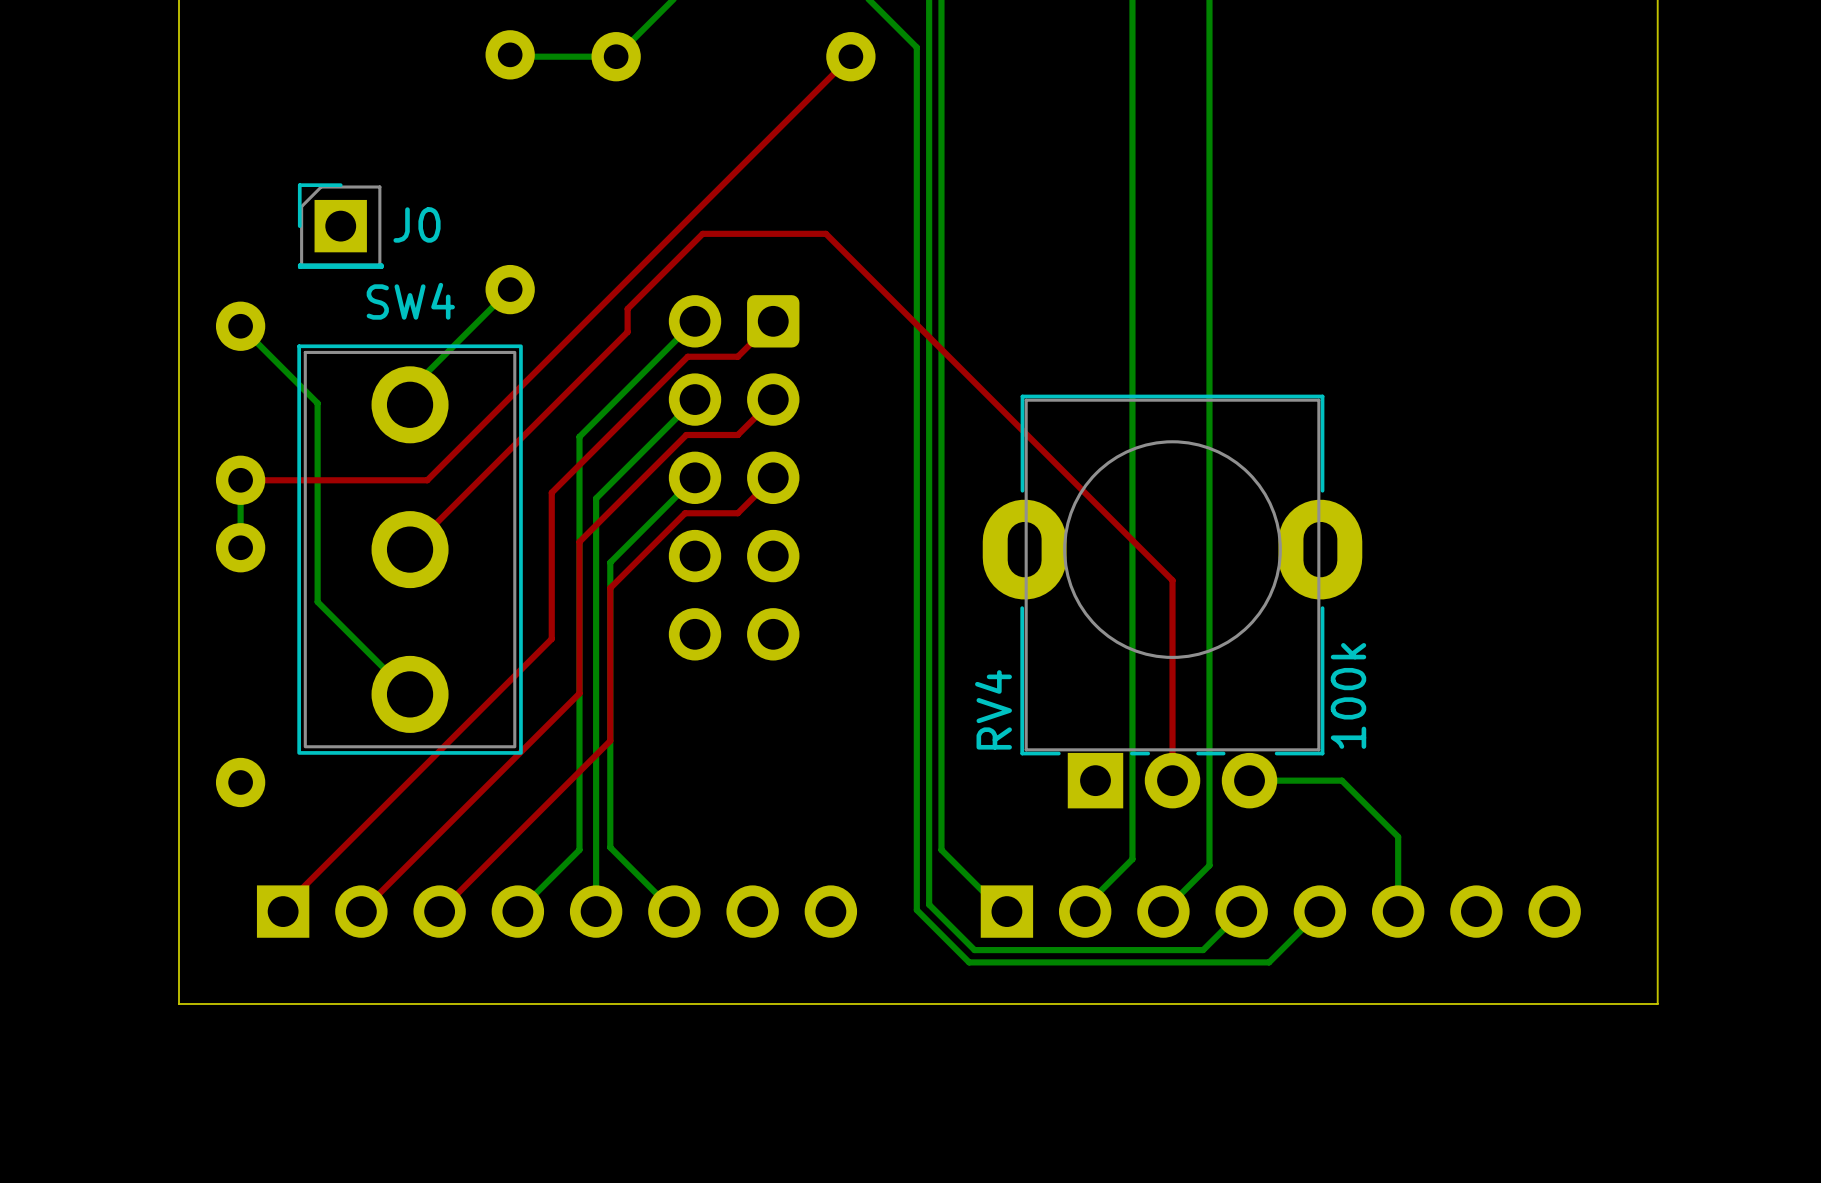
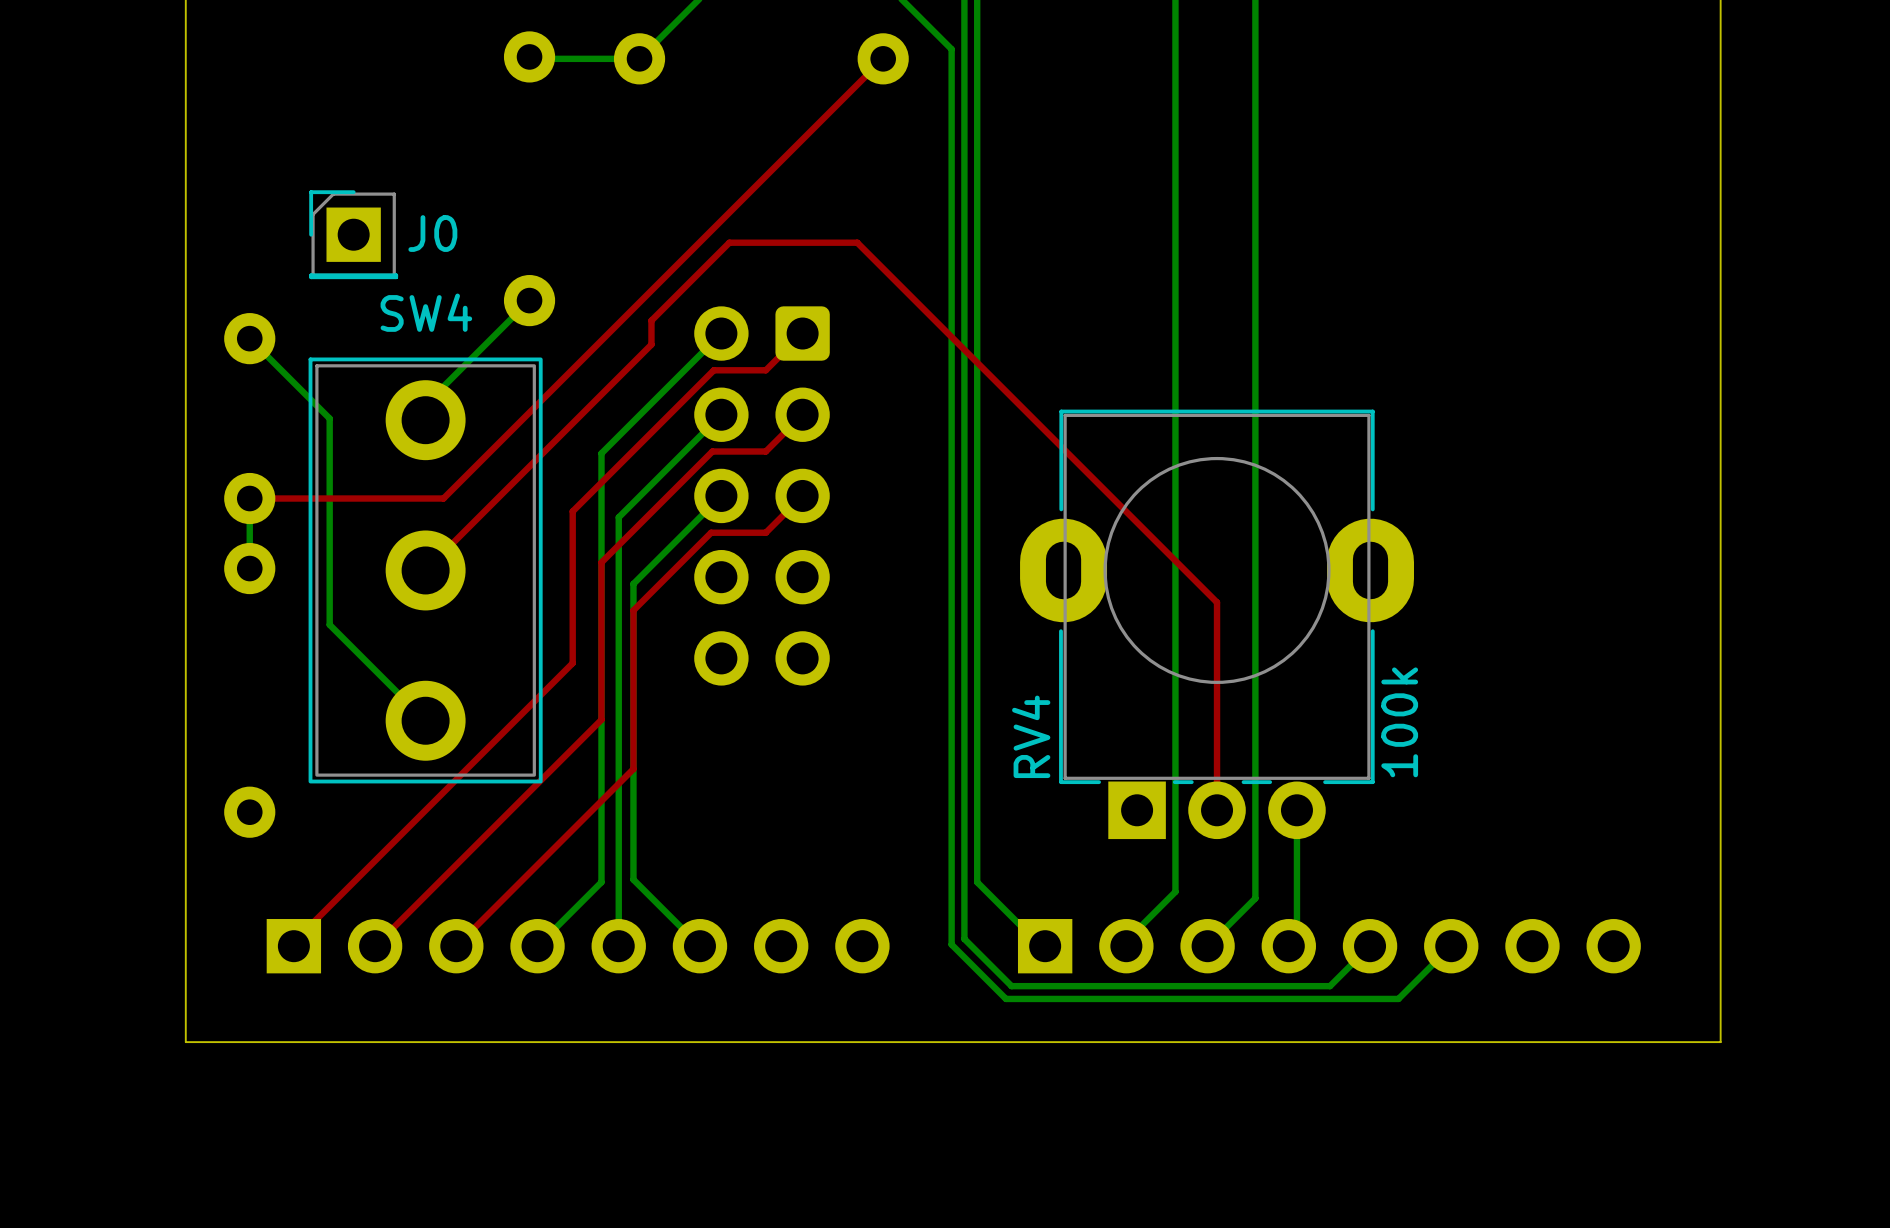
bottom track: (1249, 780) (1341, 780) (1398, 836) (1398, 911) -> (1296, 810) (1296, 938) (1288, 946)
bottom track: (1241, 911) (1203, 950) -> (1330, 986) (1248, 986)
bottom track: (1281, 950) (1269, 962) -> (1451, 946) (1398, 998) (1317, 998)

